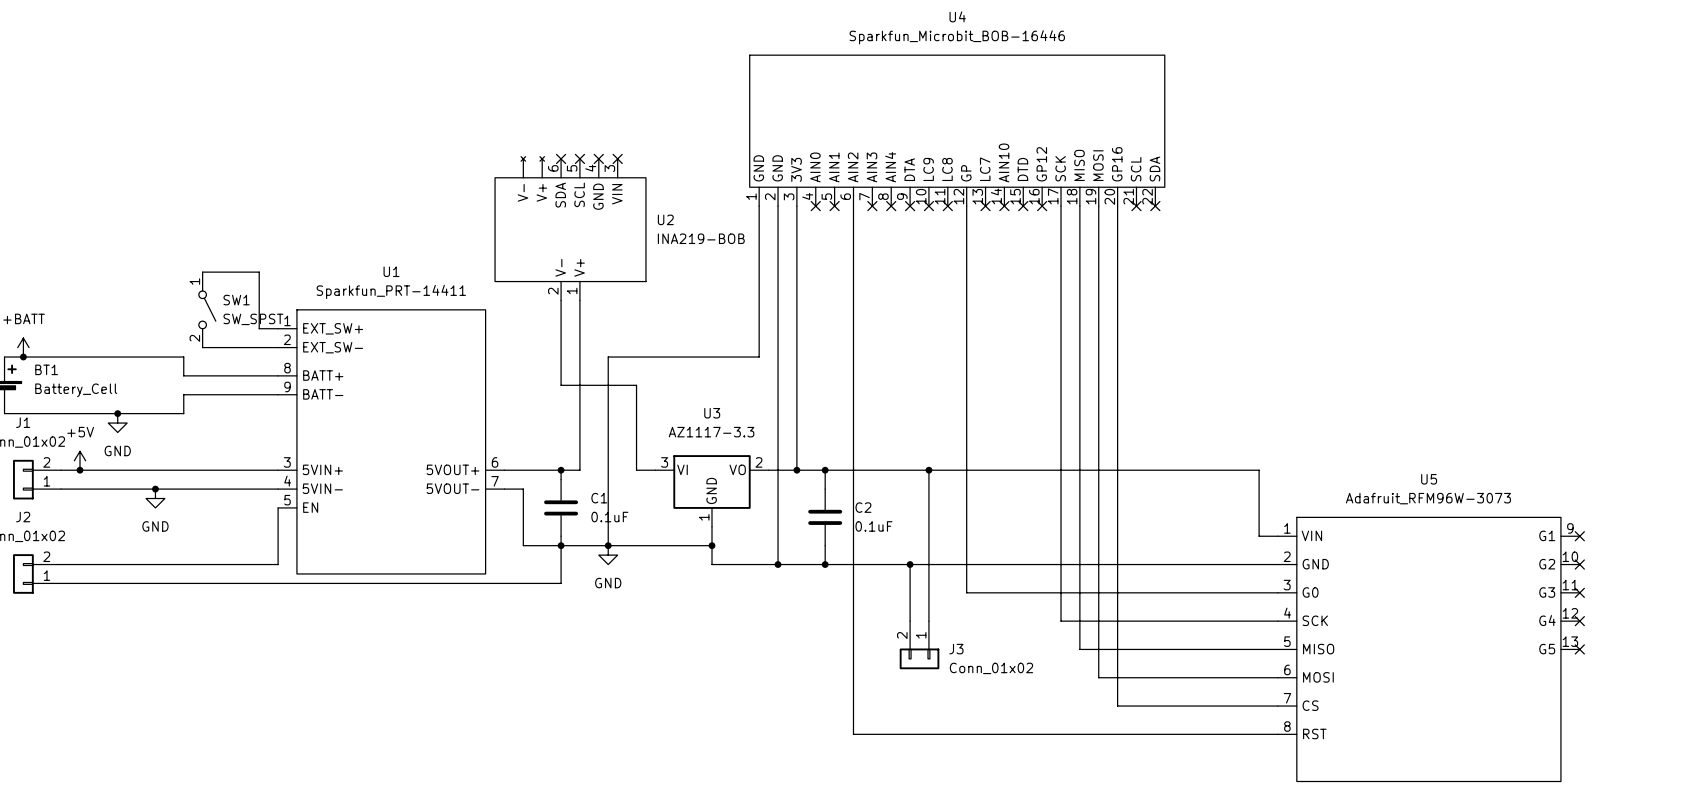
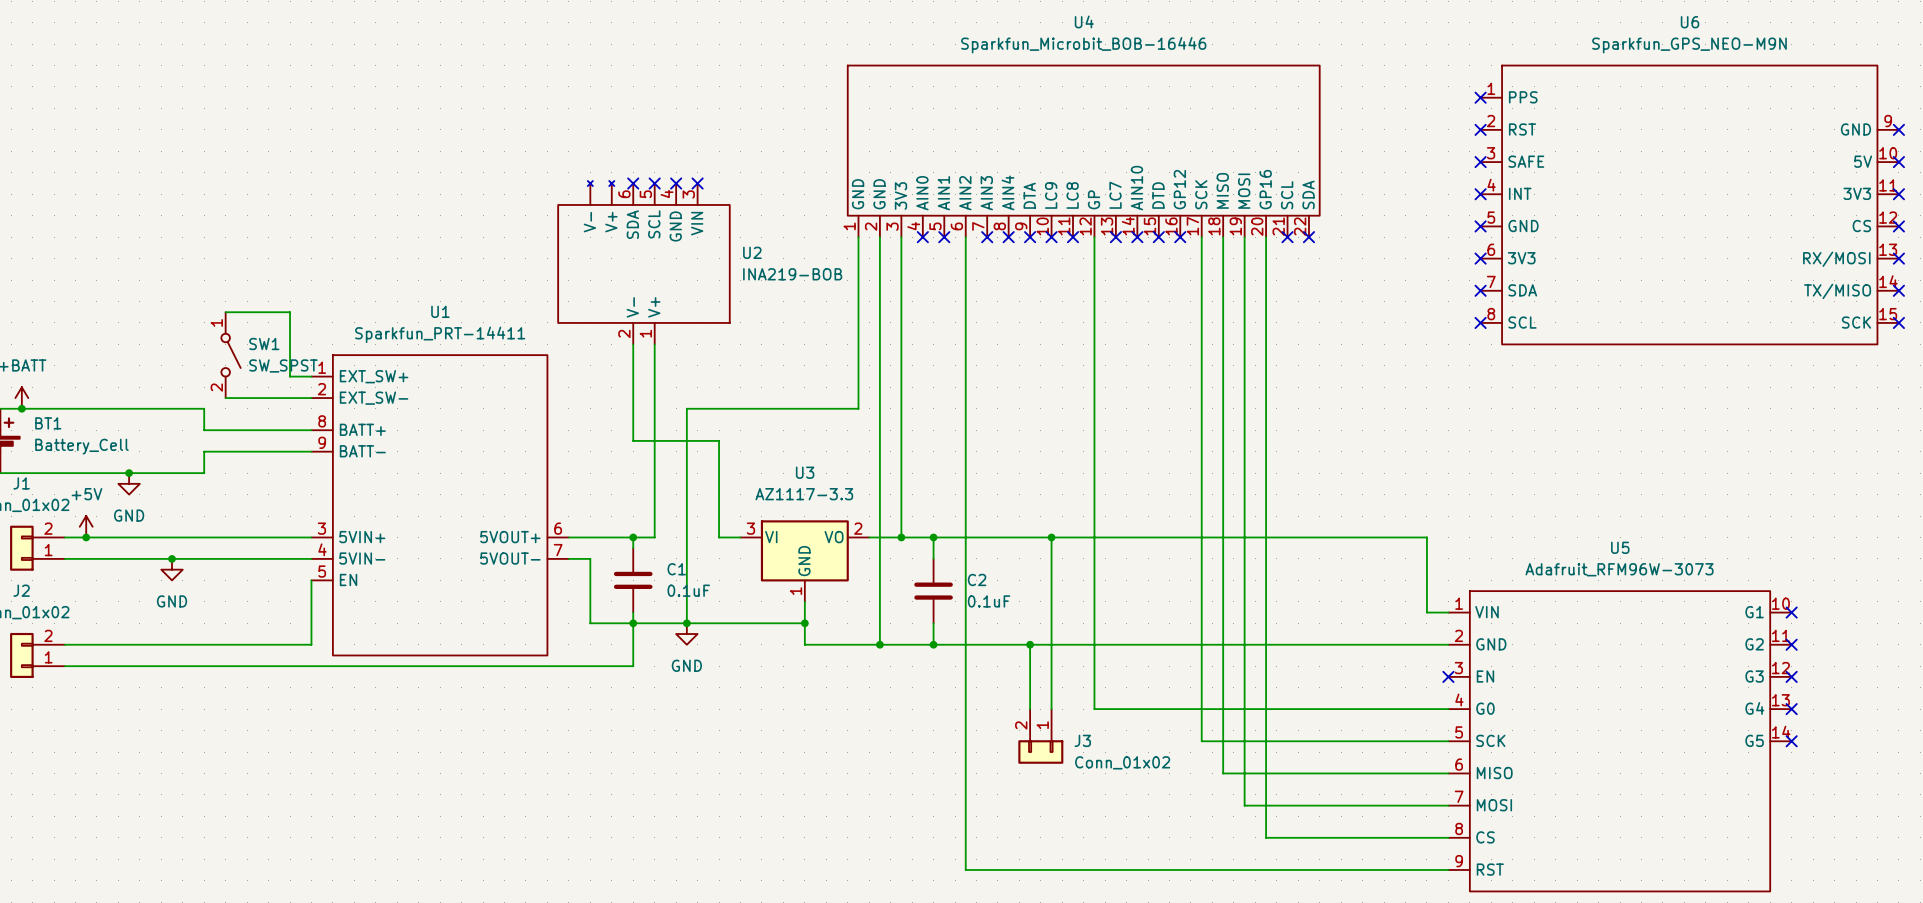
no-connect mark: none -> (1480, 97)
no-connect mark: none -> (1480, 129)
no-connect mark: none -> (1898, 129)
no-connect mark: none -> (1480, 162)
no-connect mark: none -> (1898, 162)
no-connect mark: none -> (1480, 194)
no-connect mark: none -> (1898, 194)
U6: none -> Sparkfun_GPS_NEO-M9N (1689, 204)
no-connect mark: none -> (1480, 226)
no-connect mark: none -> (1898, 226)
no-connect mark: none -> (1480, 258)
no-connect mark: none -> (1898, 258)
no-connect mark: none -> (1480, 290)
no-connect mark: none -> (1898, 290)
no-connect mark: none -> (1480, 322)
no-connect mark: none -> (1898, 322)
U5 symbol: [1277, 517, 1580, 782] -> [1448, 591, 1792, 892]
wire: (966, 592) (1277, 592) -> (1094, 676) (1094, 709) (1201, 709) (1201, 741) (1223, 741) (1223, 773) (1244, 773) (1244, 805) (1266, 805) (1266, 837)
no-connect mark: none -> (1448, 676)
wire: (853, 734) (1117, 734) -> (965, 837) (965, 869) (1448, 869)

